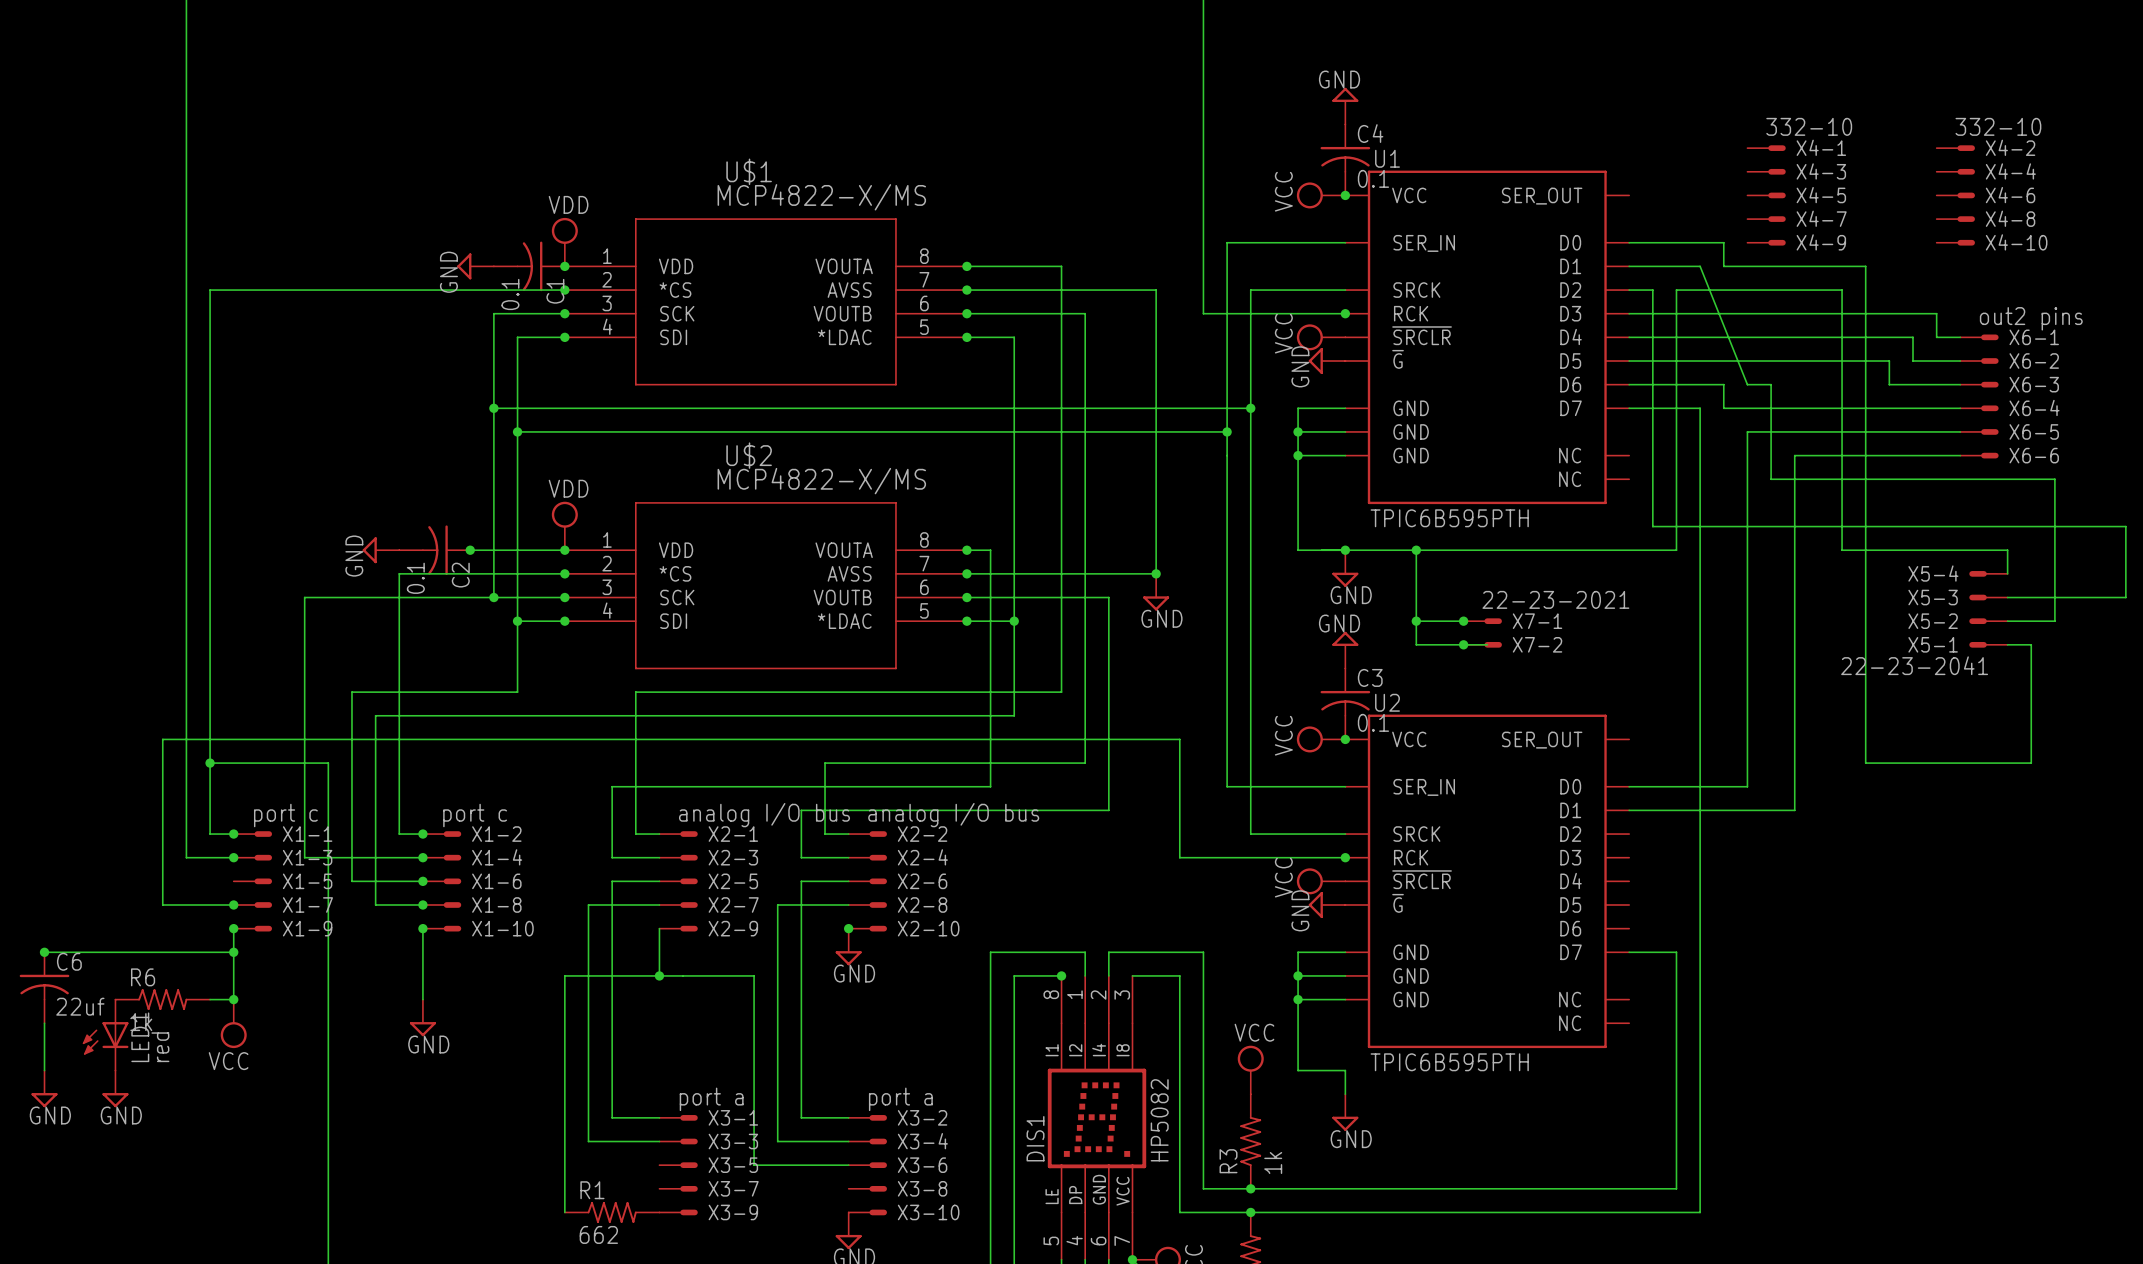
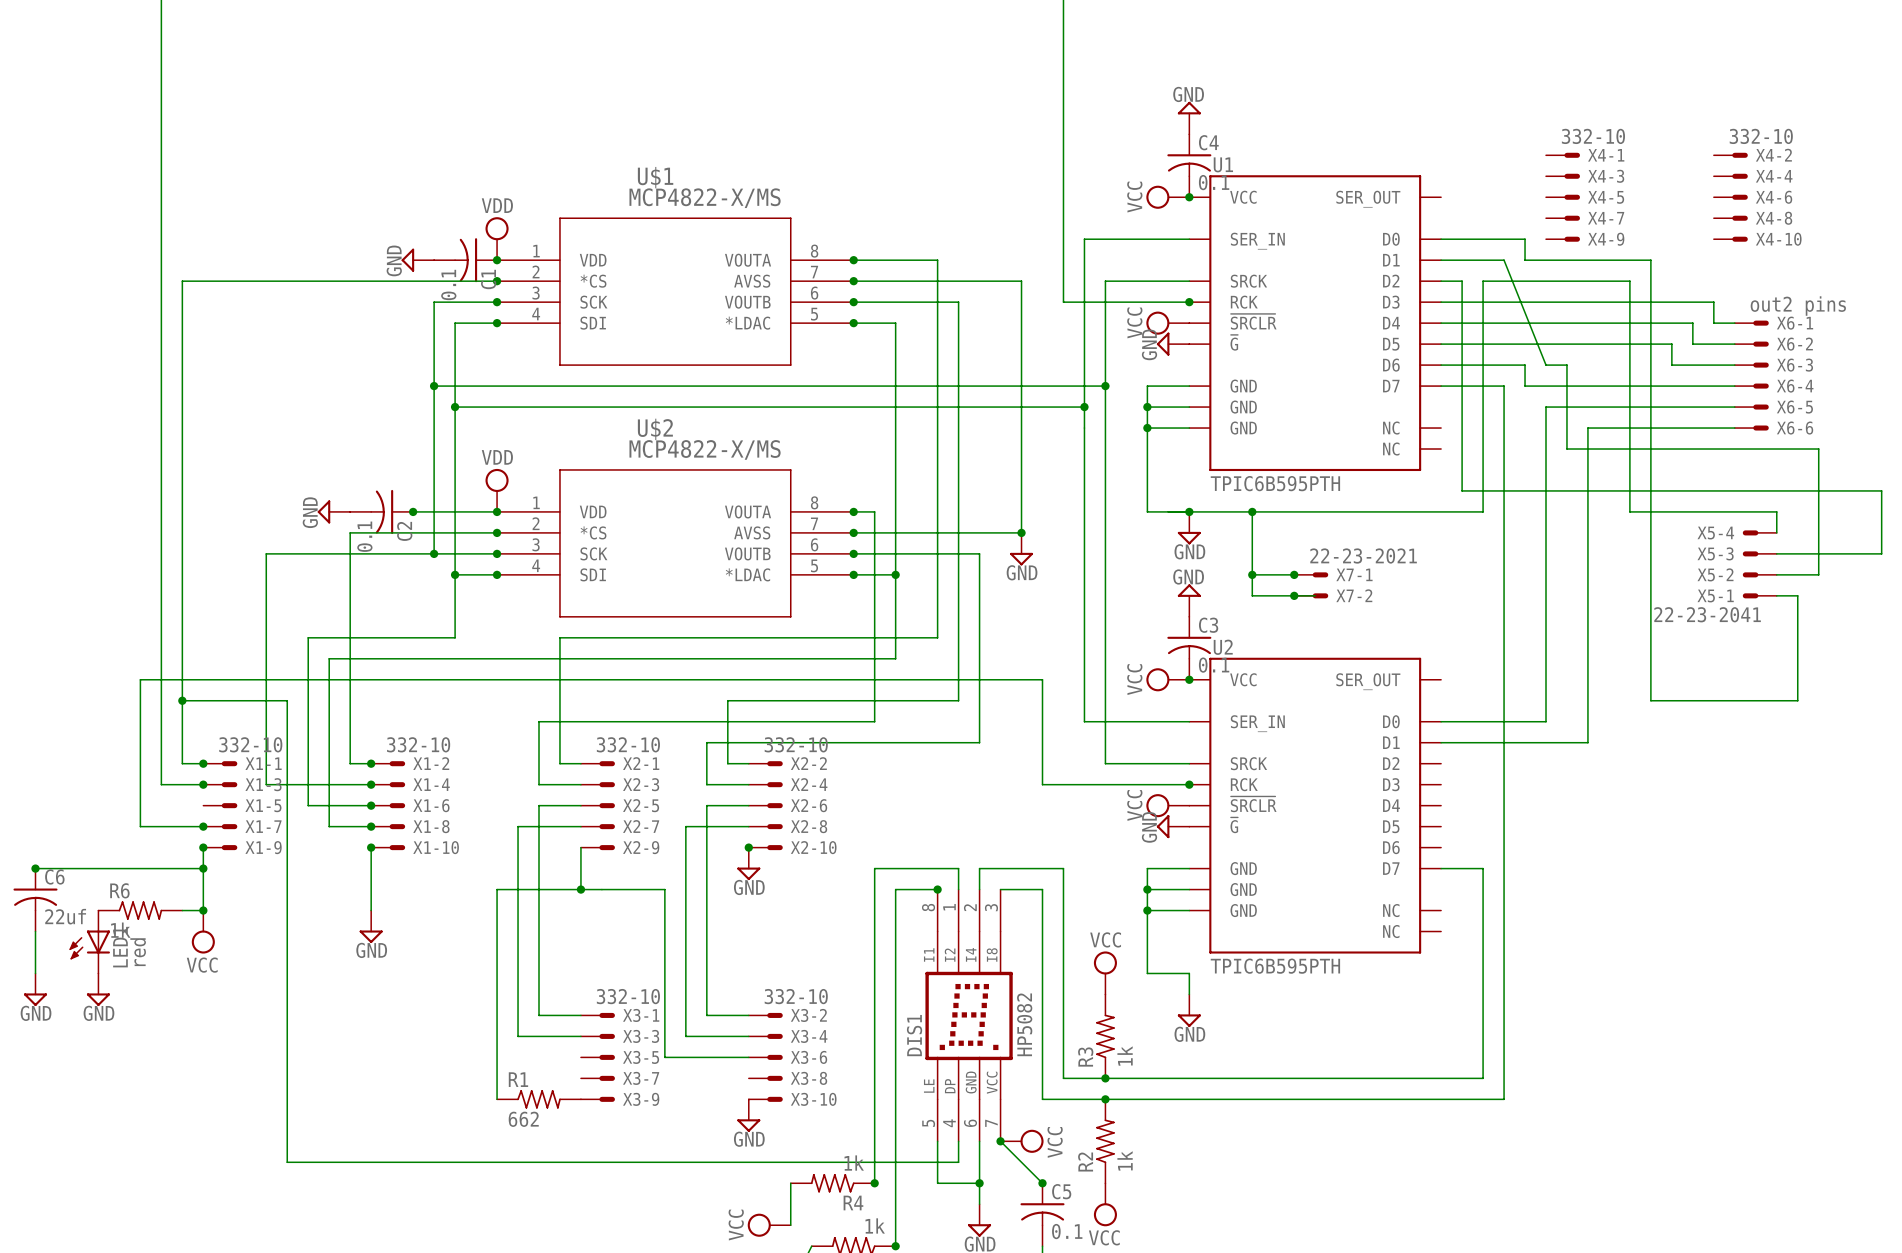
X1-1 value: port c (285, 815) -> 332-10 (250, 744)
X1-2 value: port c (475, 815) -> 332-10 (418, 744)
X2-1 value: analog I/O bus (764, 815) -> 332-10 (628, 744)
X2-2 value: analog I/O bus (953, 815) -> 332-10 (796, 744)
X3-1 value: port a (711, 1099) -> 332-10 (628, 996)
X3-2 value: port a (900, 1099) -> 332-10 (796, 996)

